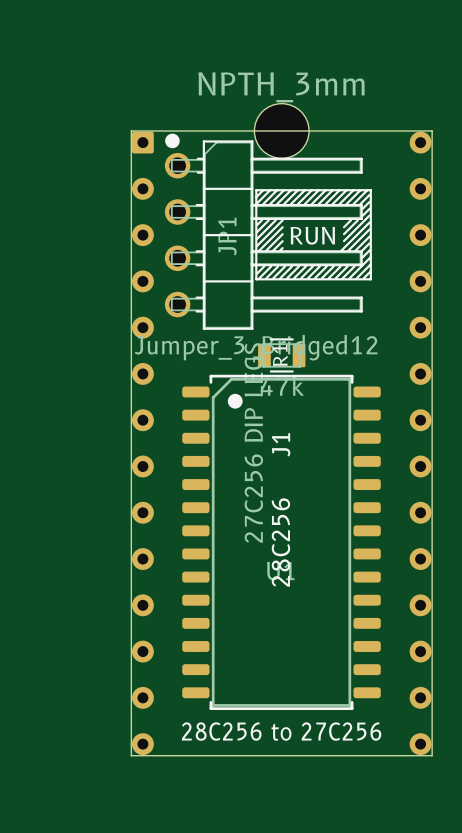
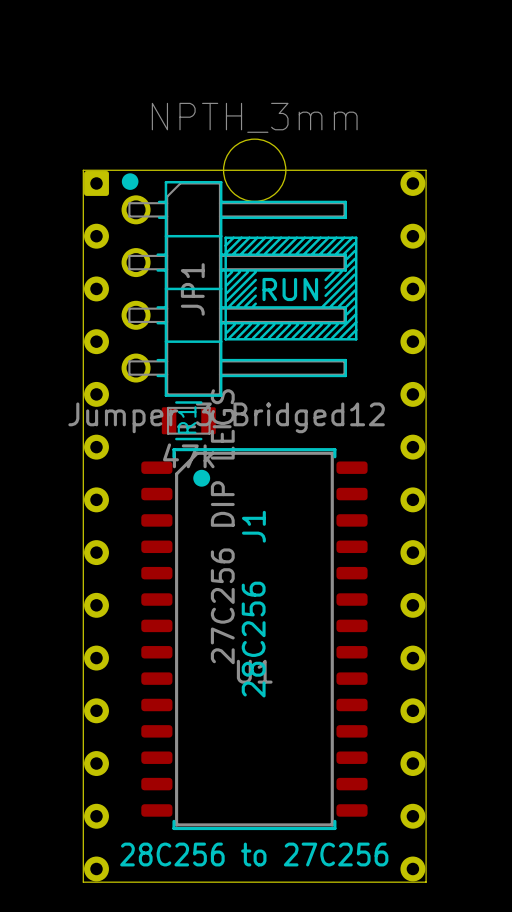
R1 position: (281, 355) -> (188, 420)

